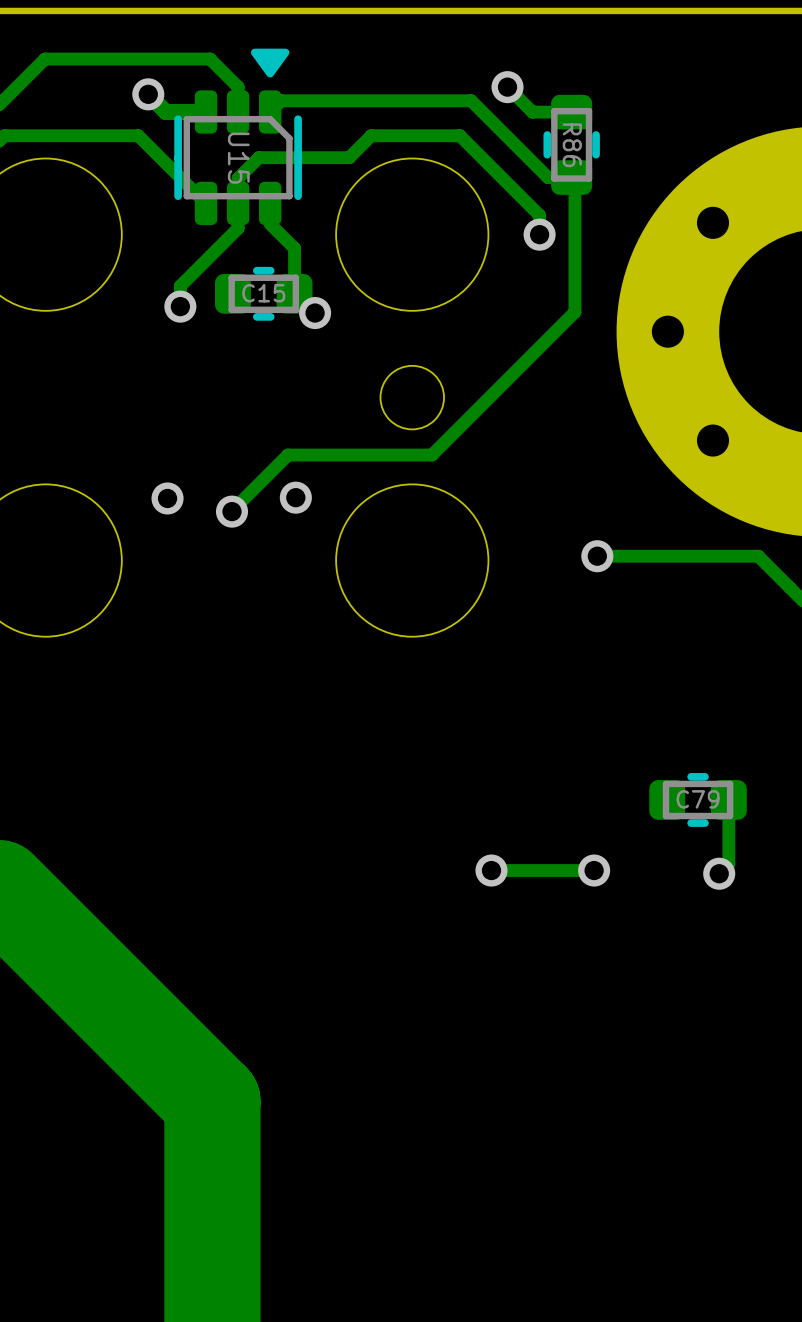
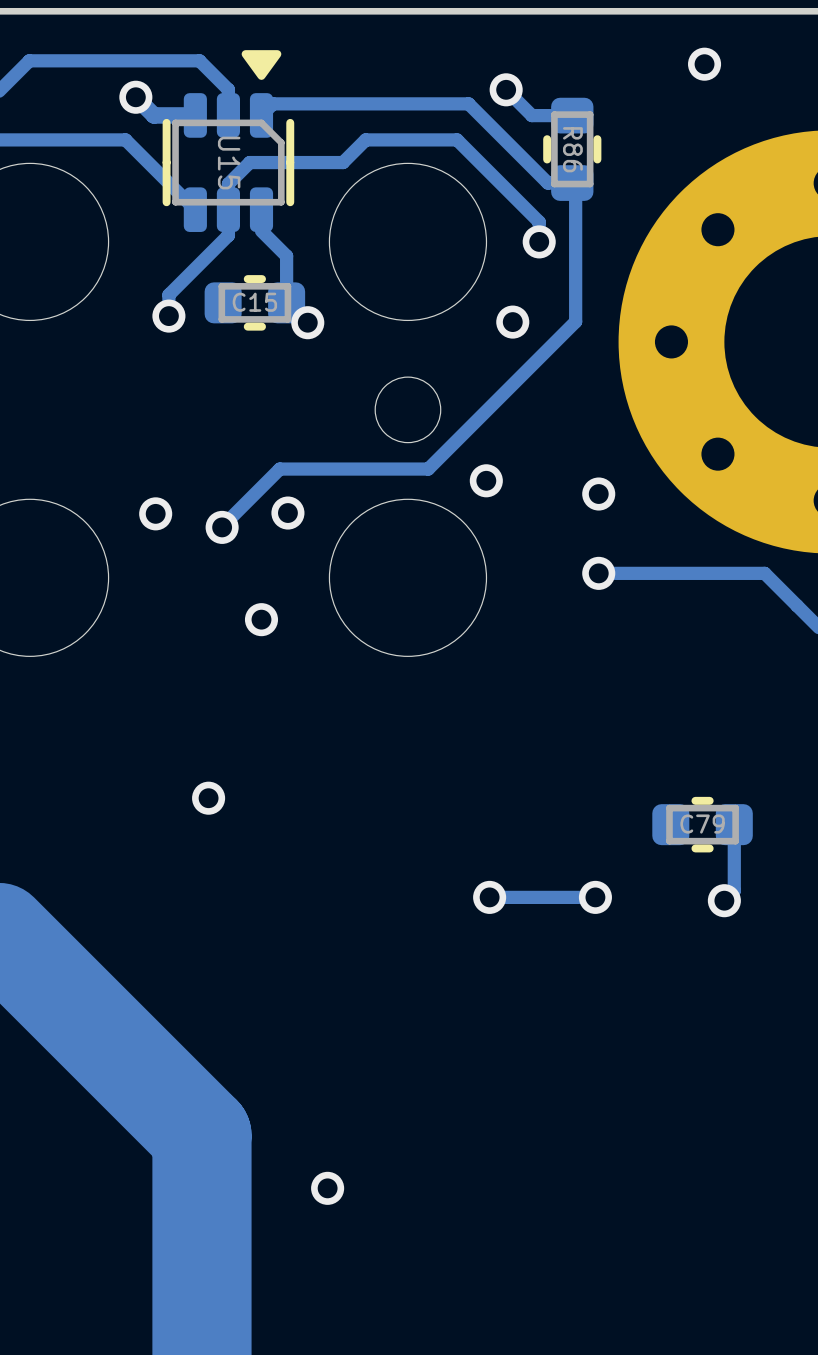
via: none -> (704, 64)
via: none -> (512, 322)
via: none -> (486, 480)
via: none -> (598, 494)
via: none -> (261, 619)
via: none -> (208, 798)
via: none -> (327, 1188)

